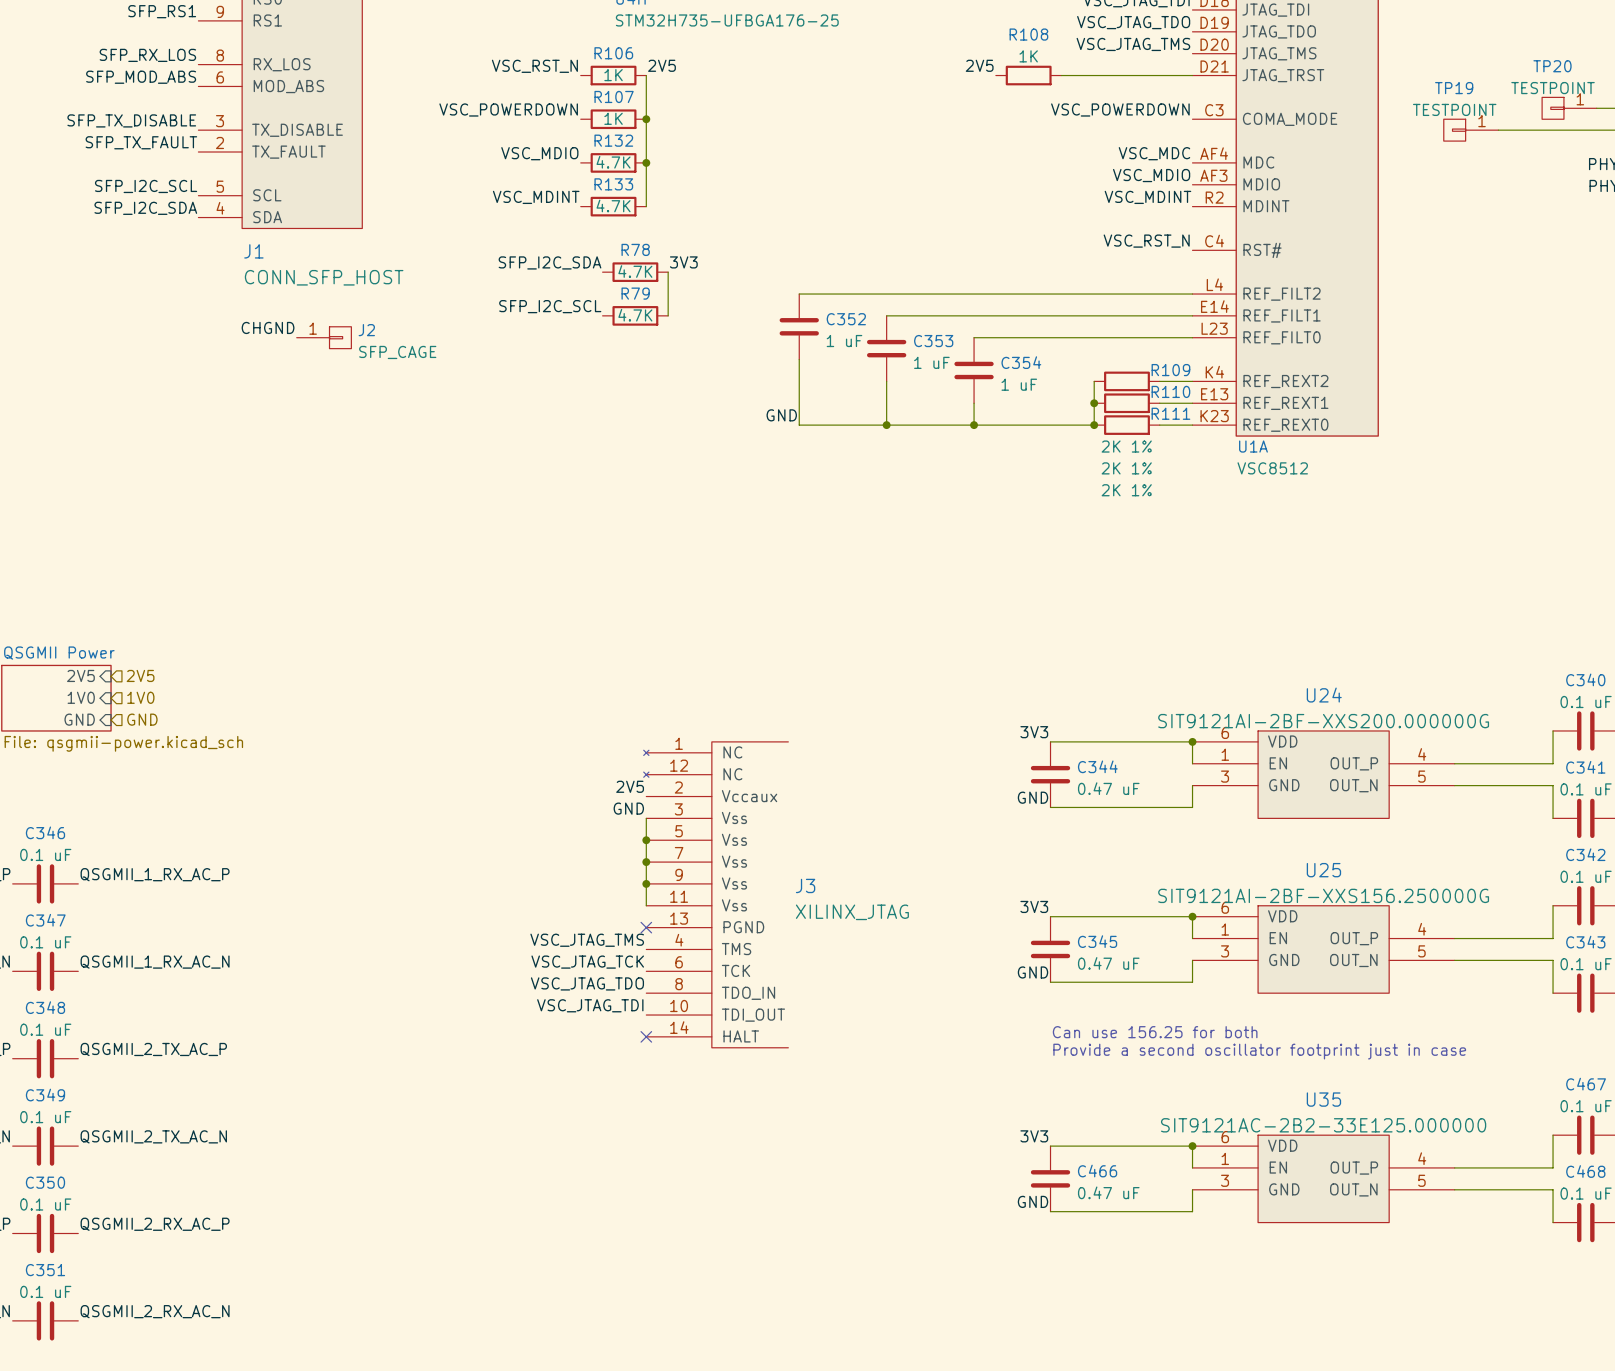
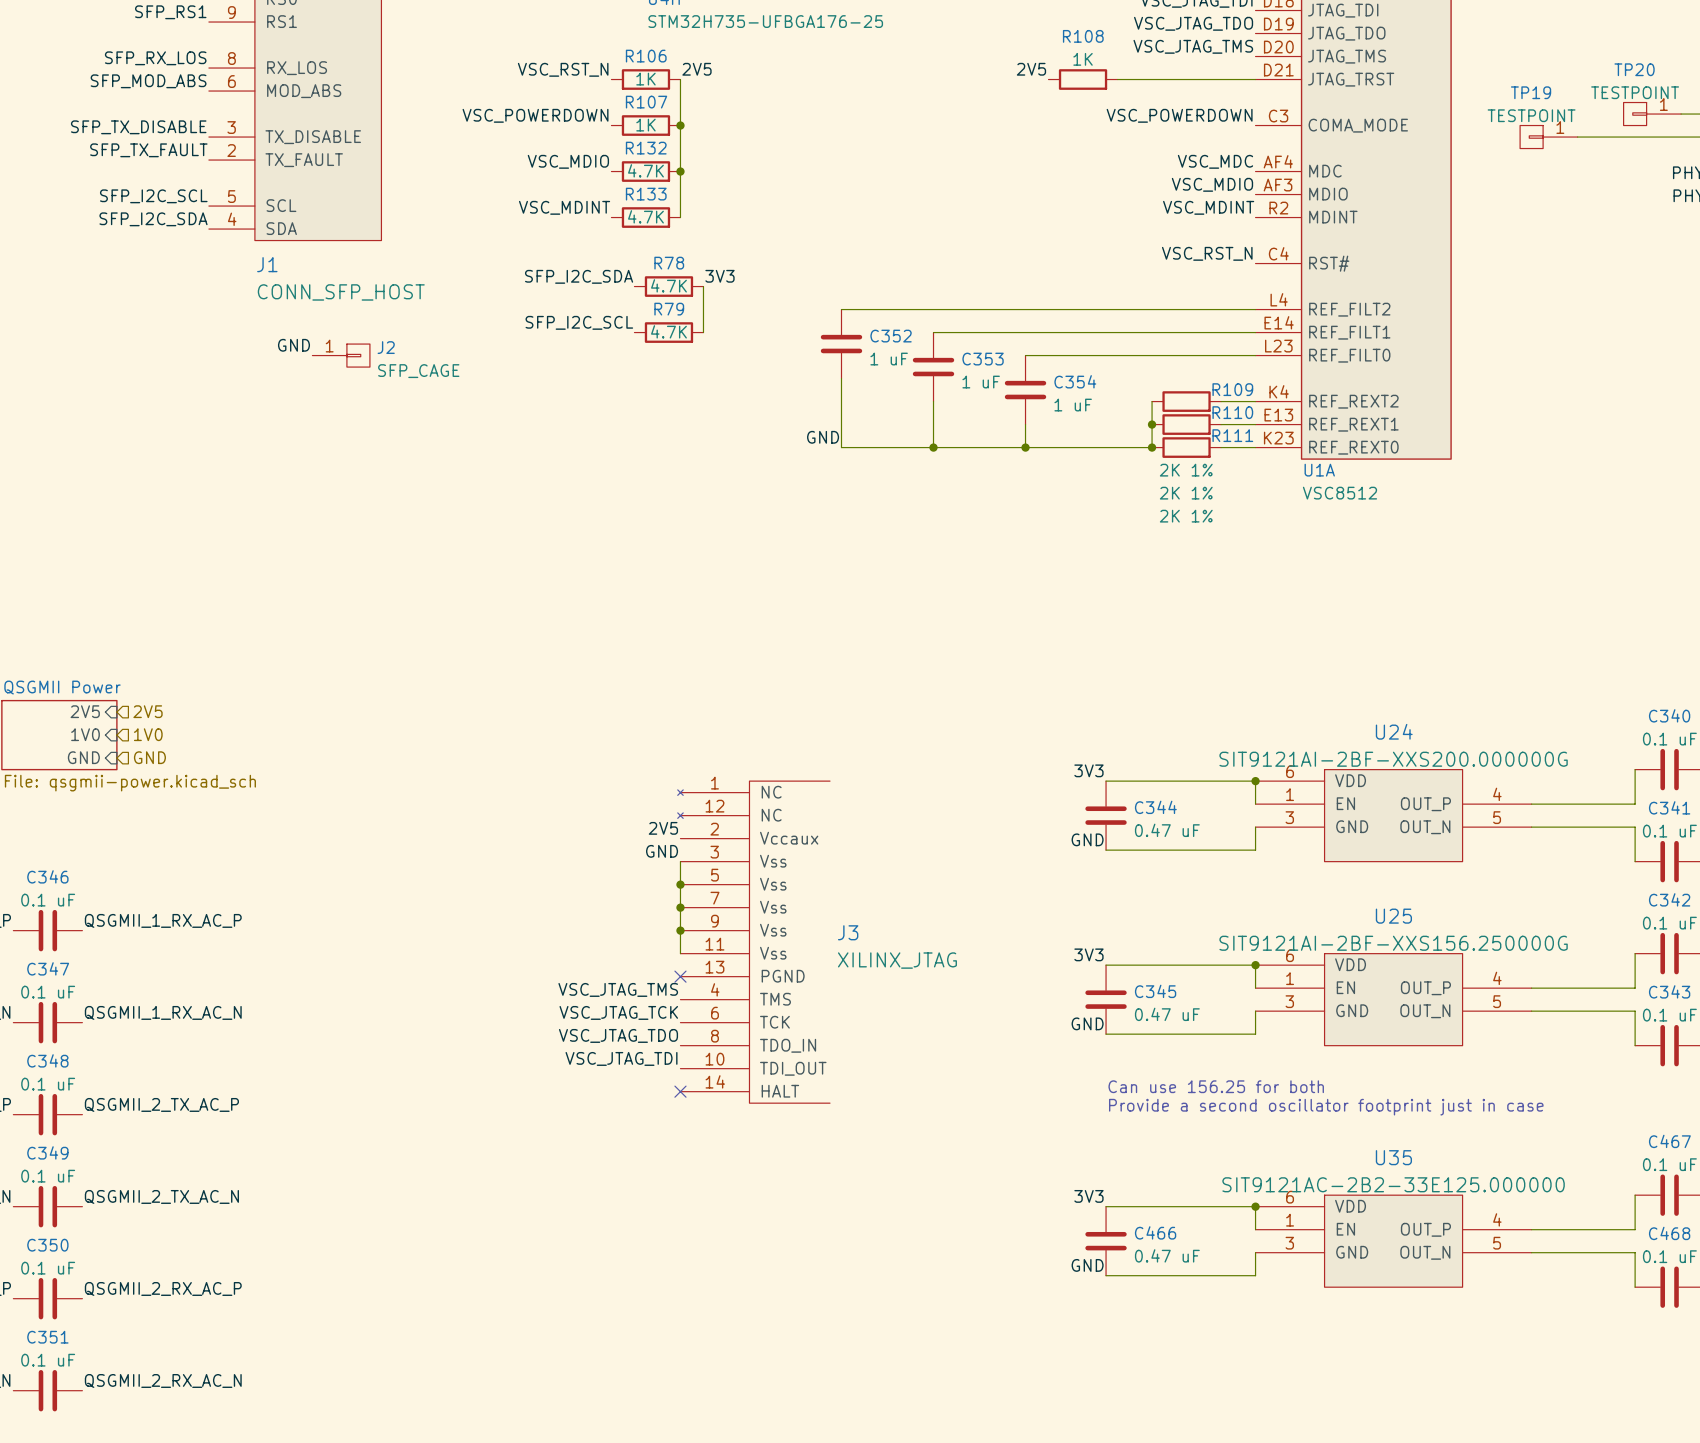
label: CHGND (268, 327) -> GND (293, 345)

